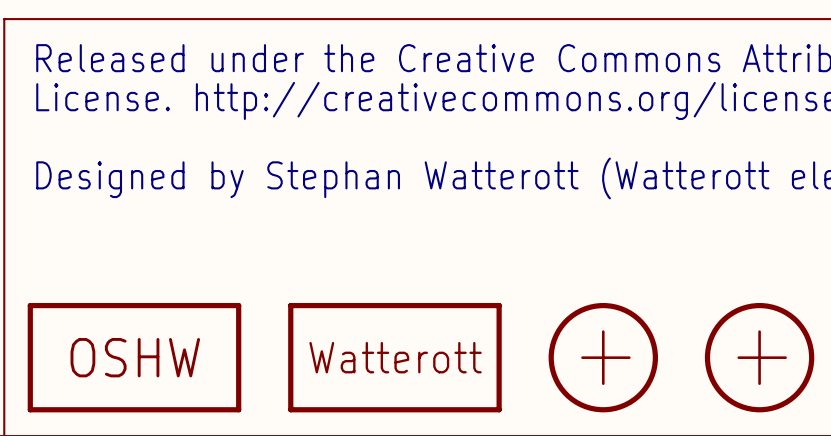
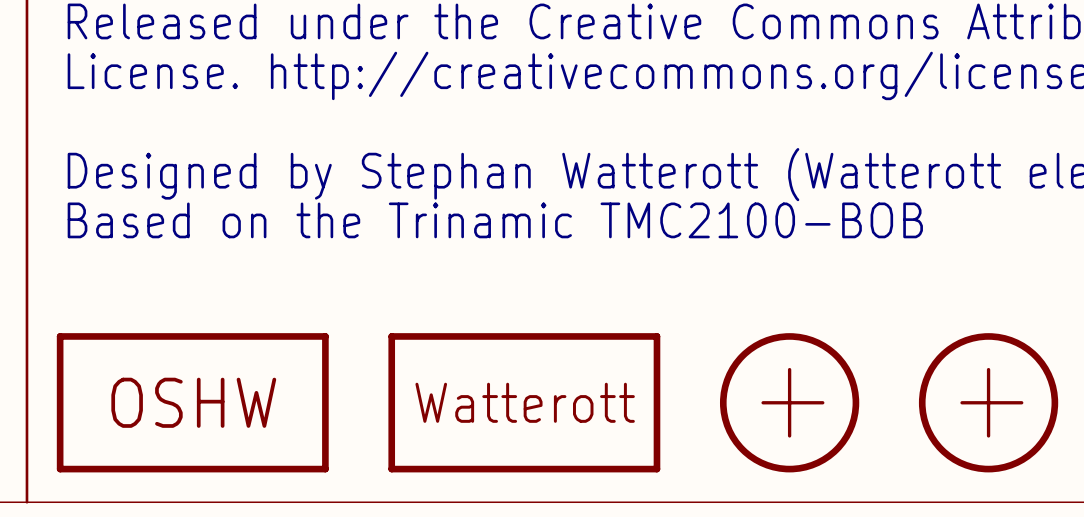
text: none -> Based on the Trinamic TMC2100-BOB (495, 220)

